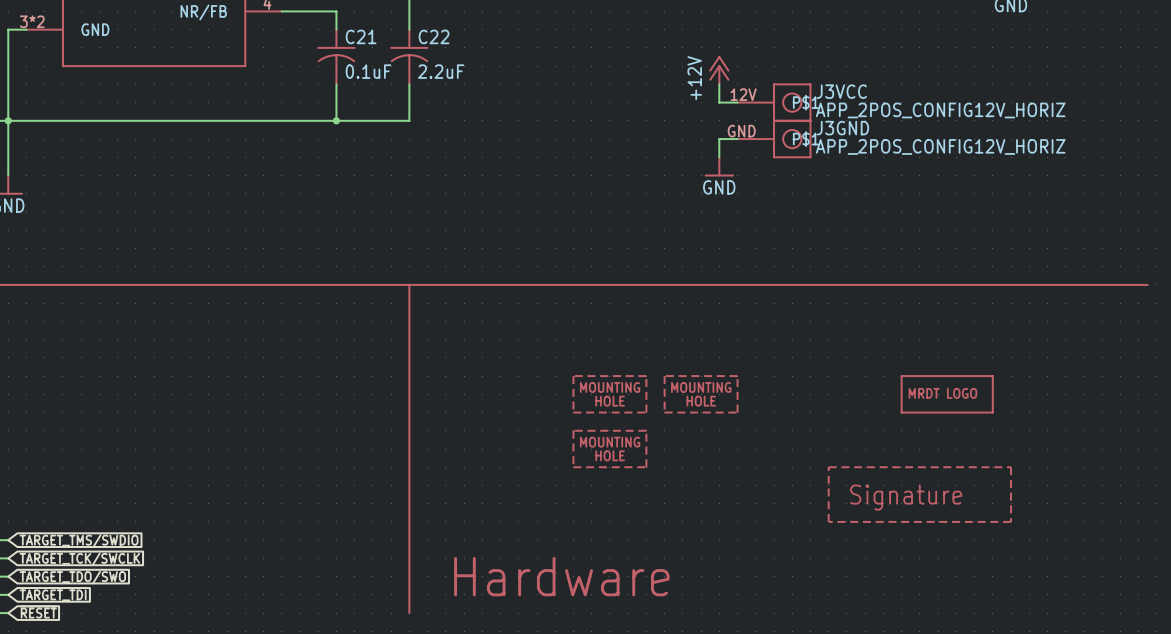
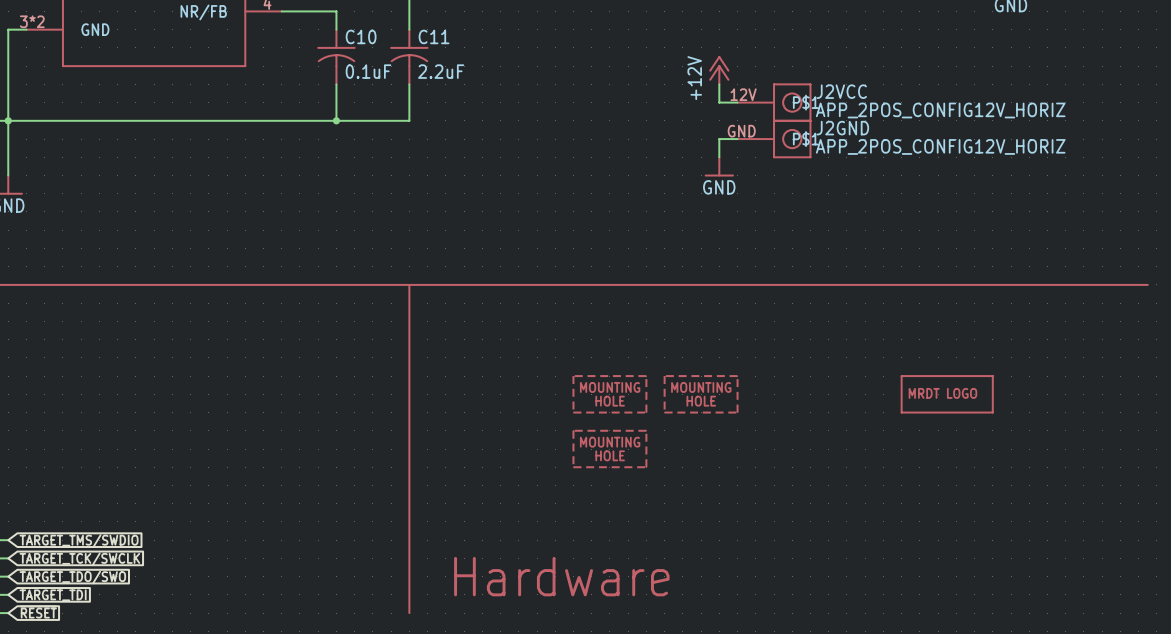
C21 name: C21 (361, 36) -> C10 (361, 36)
C22 name: C22 (434, 36) -> C11 (434, 36)
J3VCC name: J3VCC (841, 91) -> J2VCC (841, 91)
J3GND name: J3GND (842, 128) -> J2GND (842, 128)
part: (919, 494) -> none

